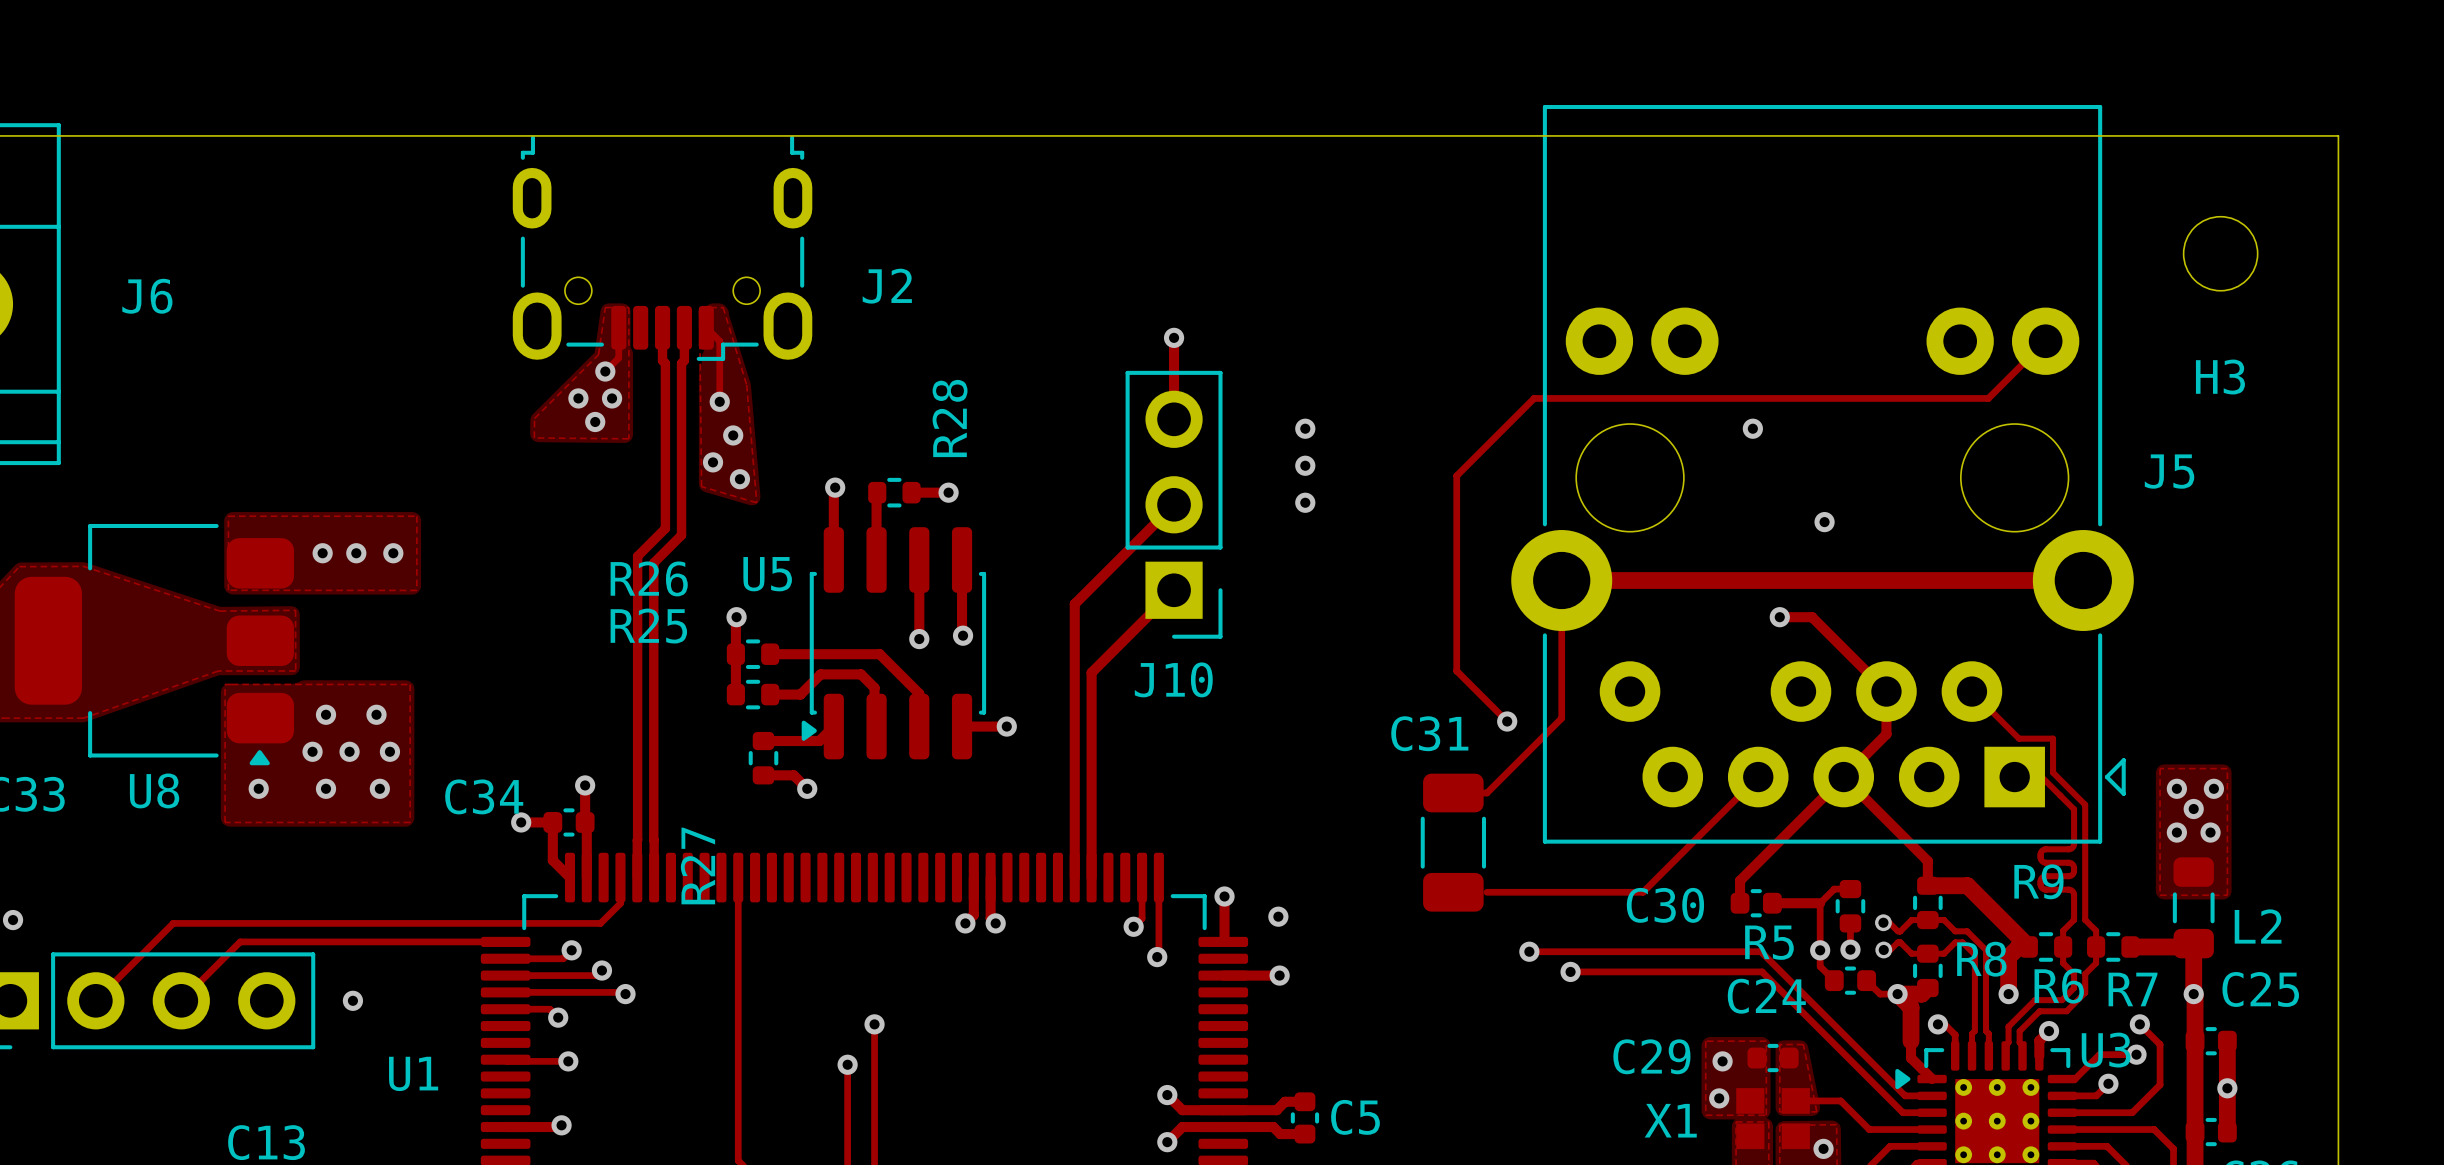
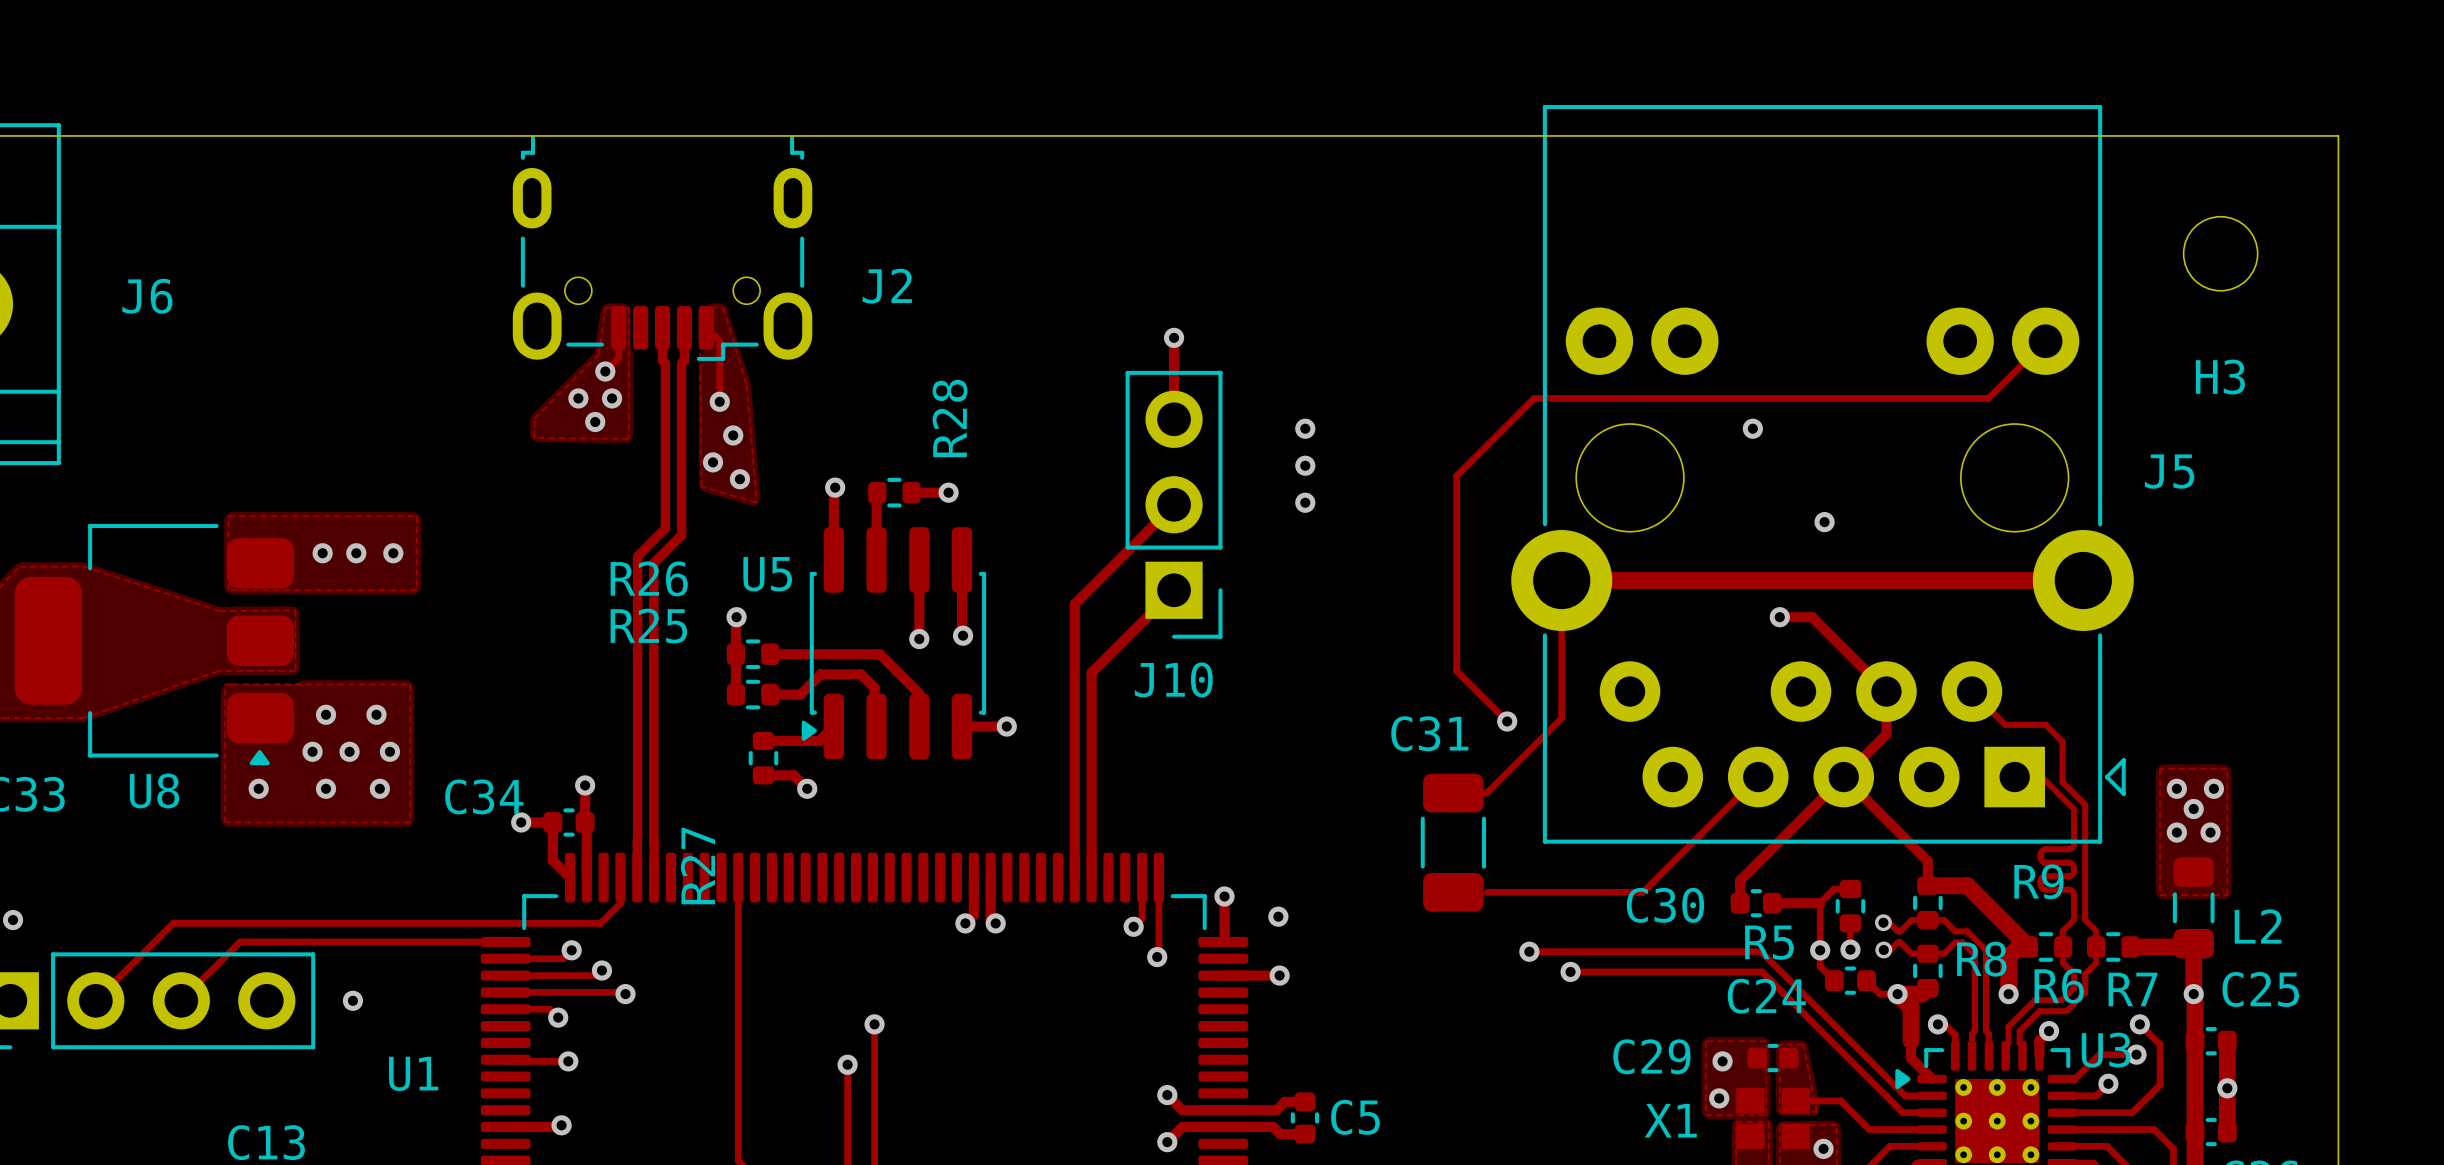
track: (2005, 724) (2019, 738) (2053, 738) (2053, 772) (2062, 782) -> (2005, 724) (2045, 724) (2062, 741) (2062, 782)

